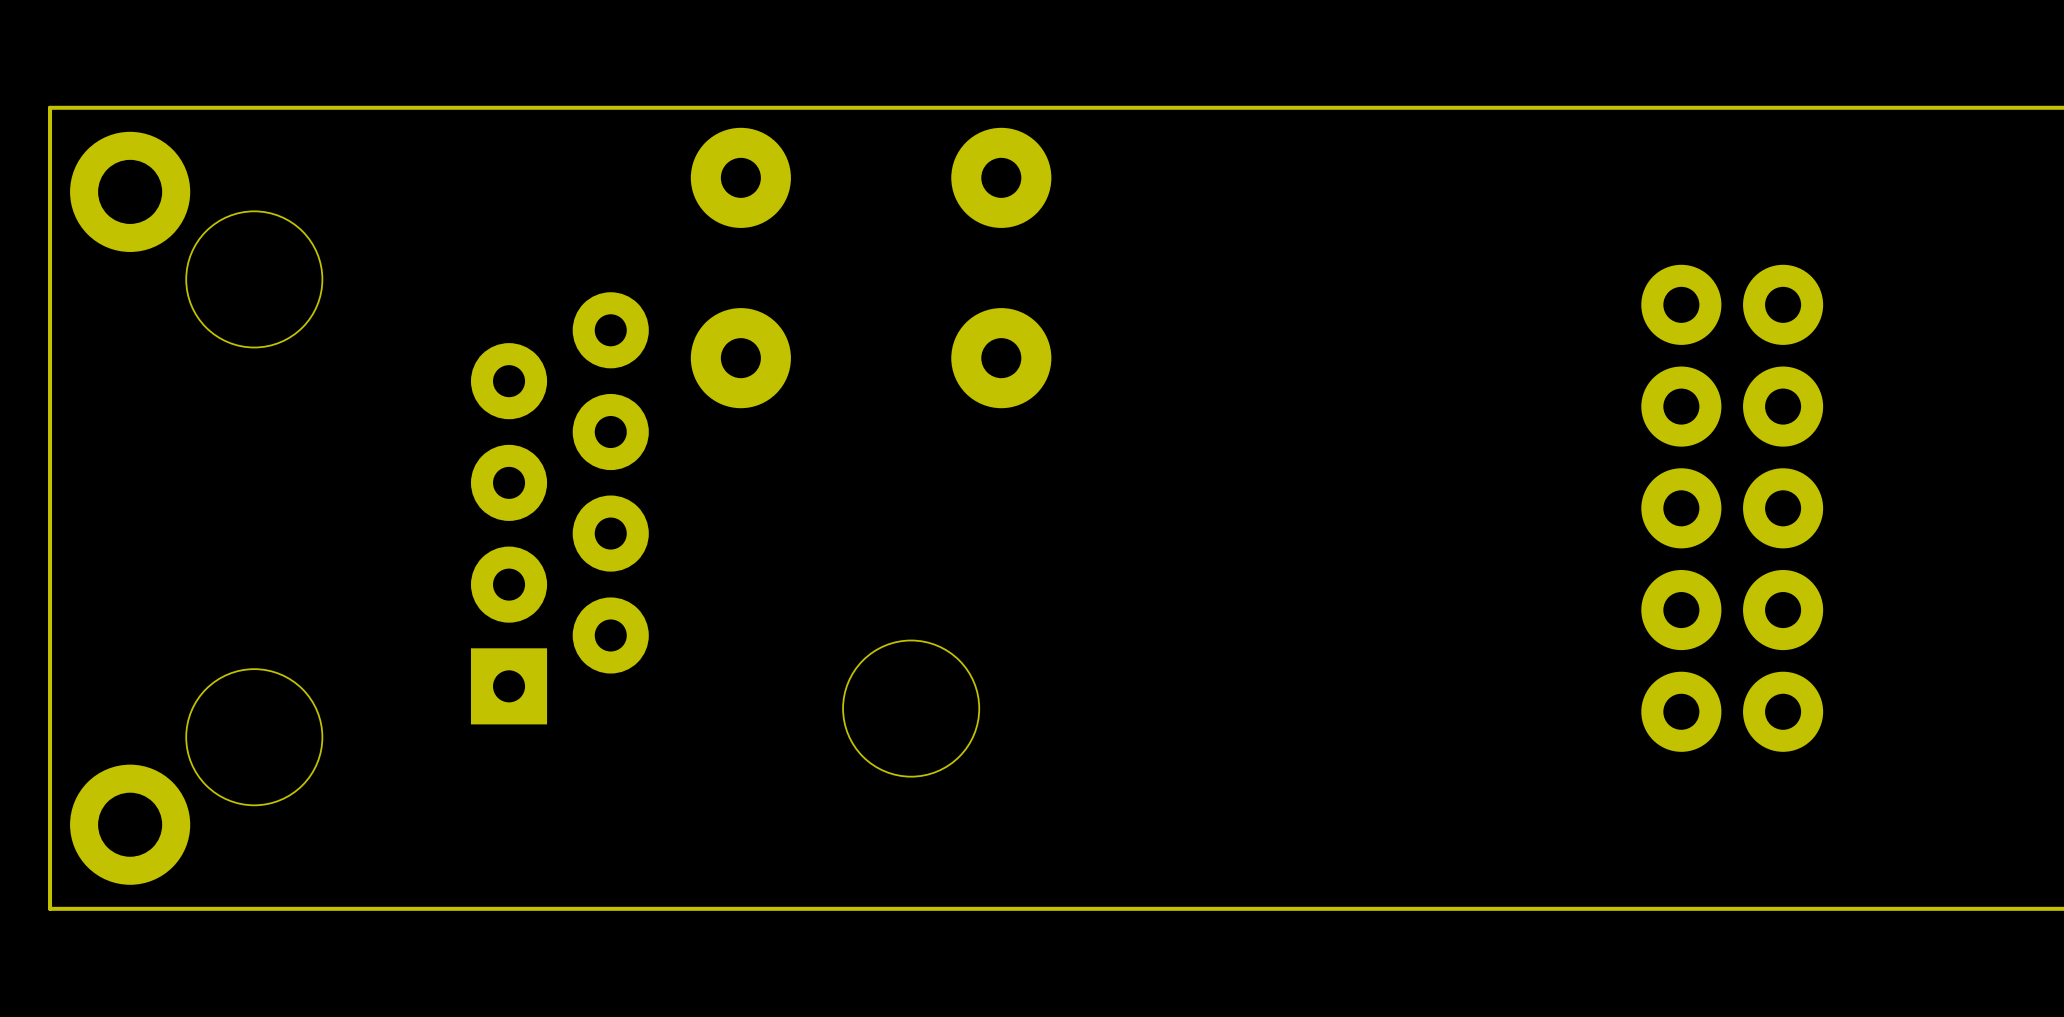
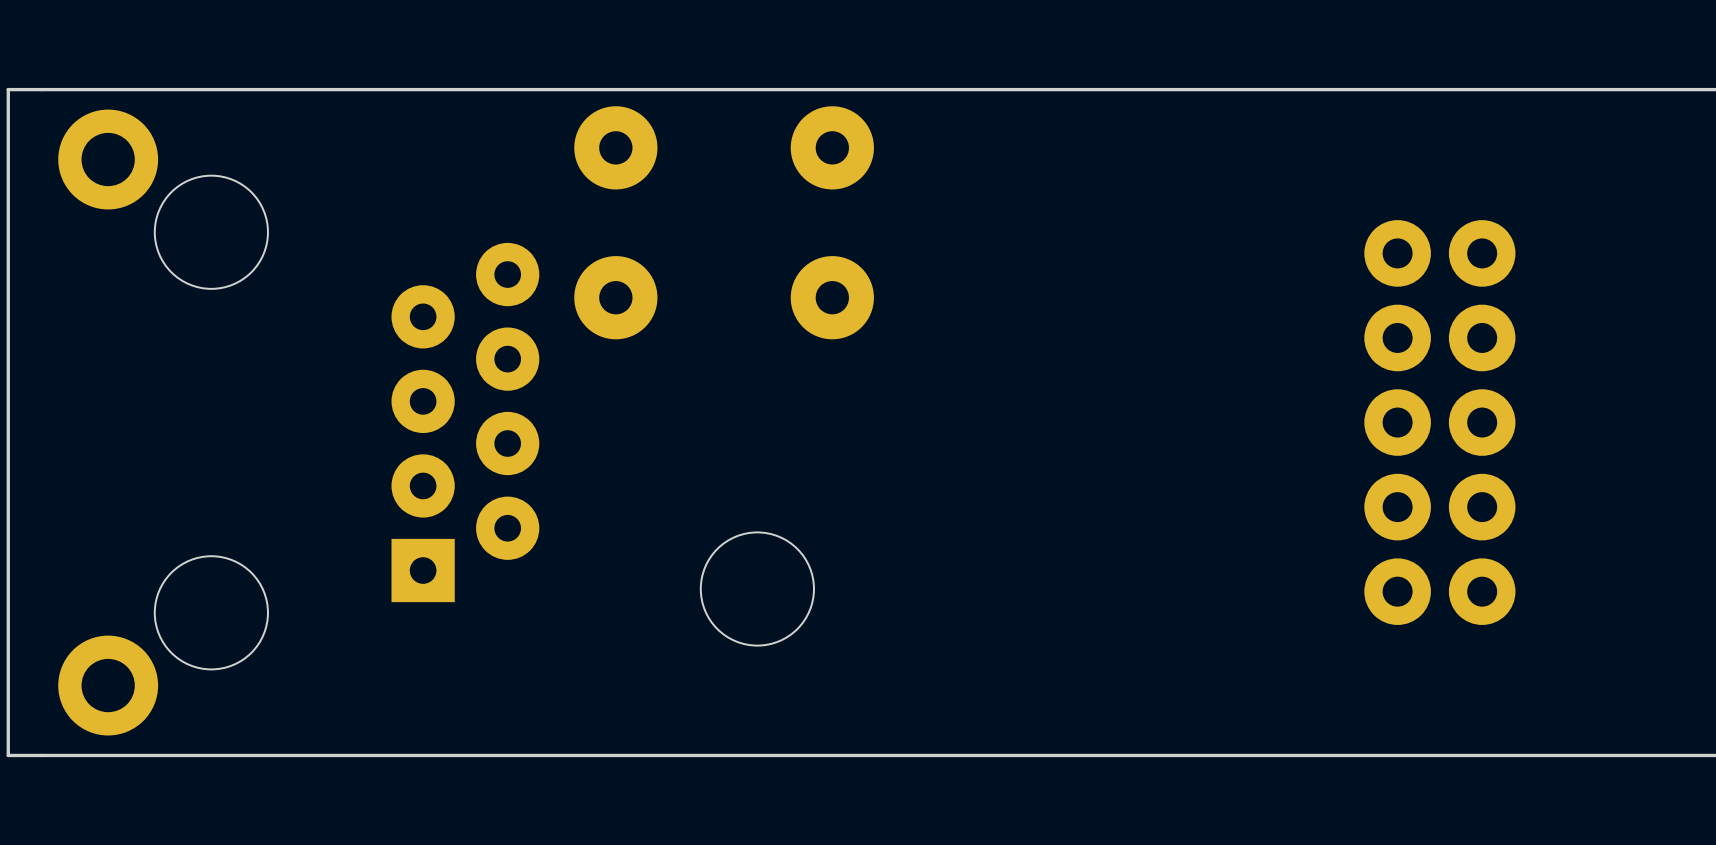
board edge: (50, 107) (50, 908) -> (41, 89) (8, 89) (8, 755) (41, 755)

